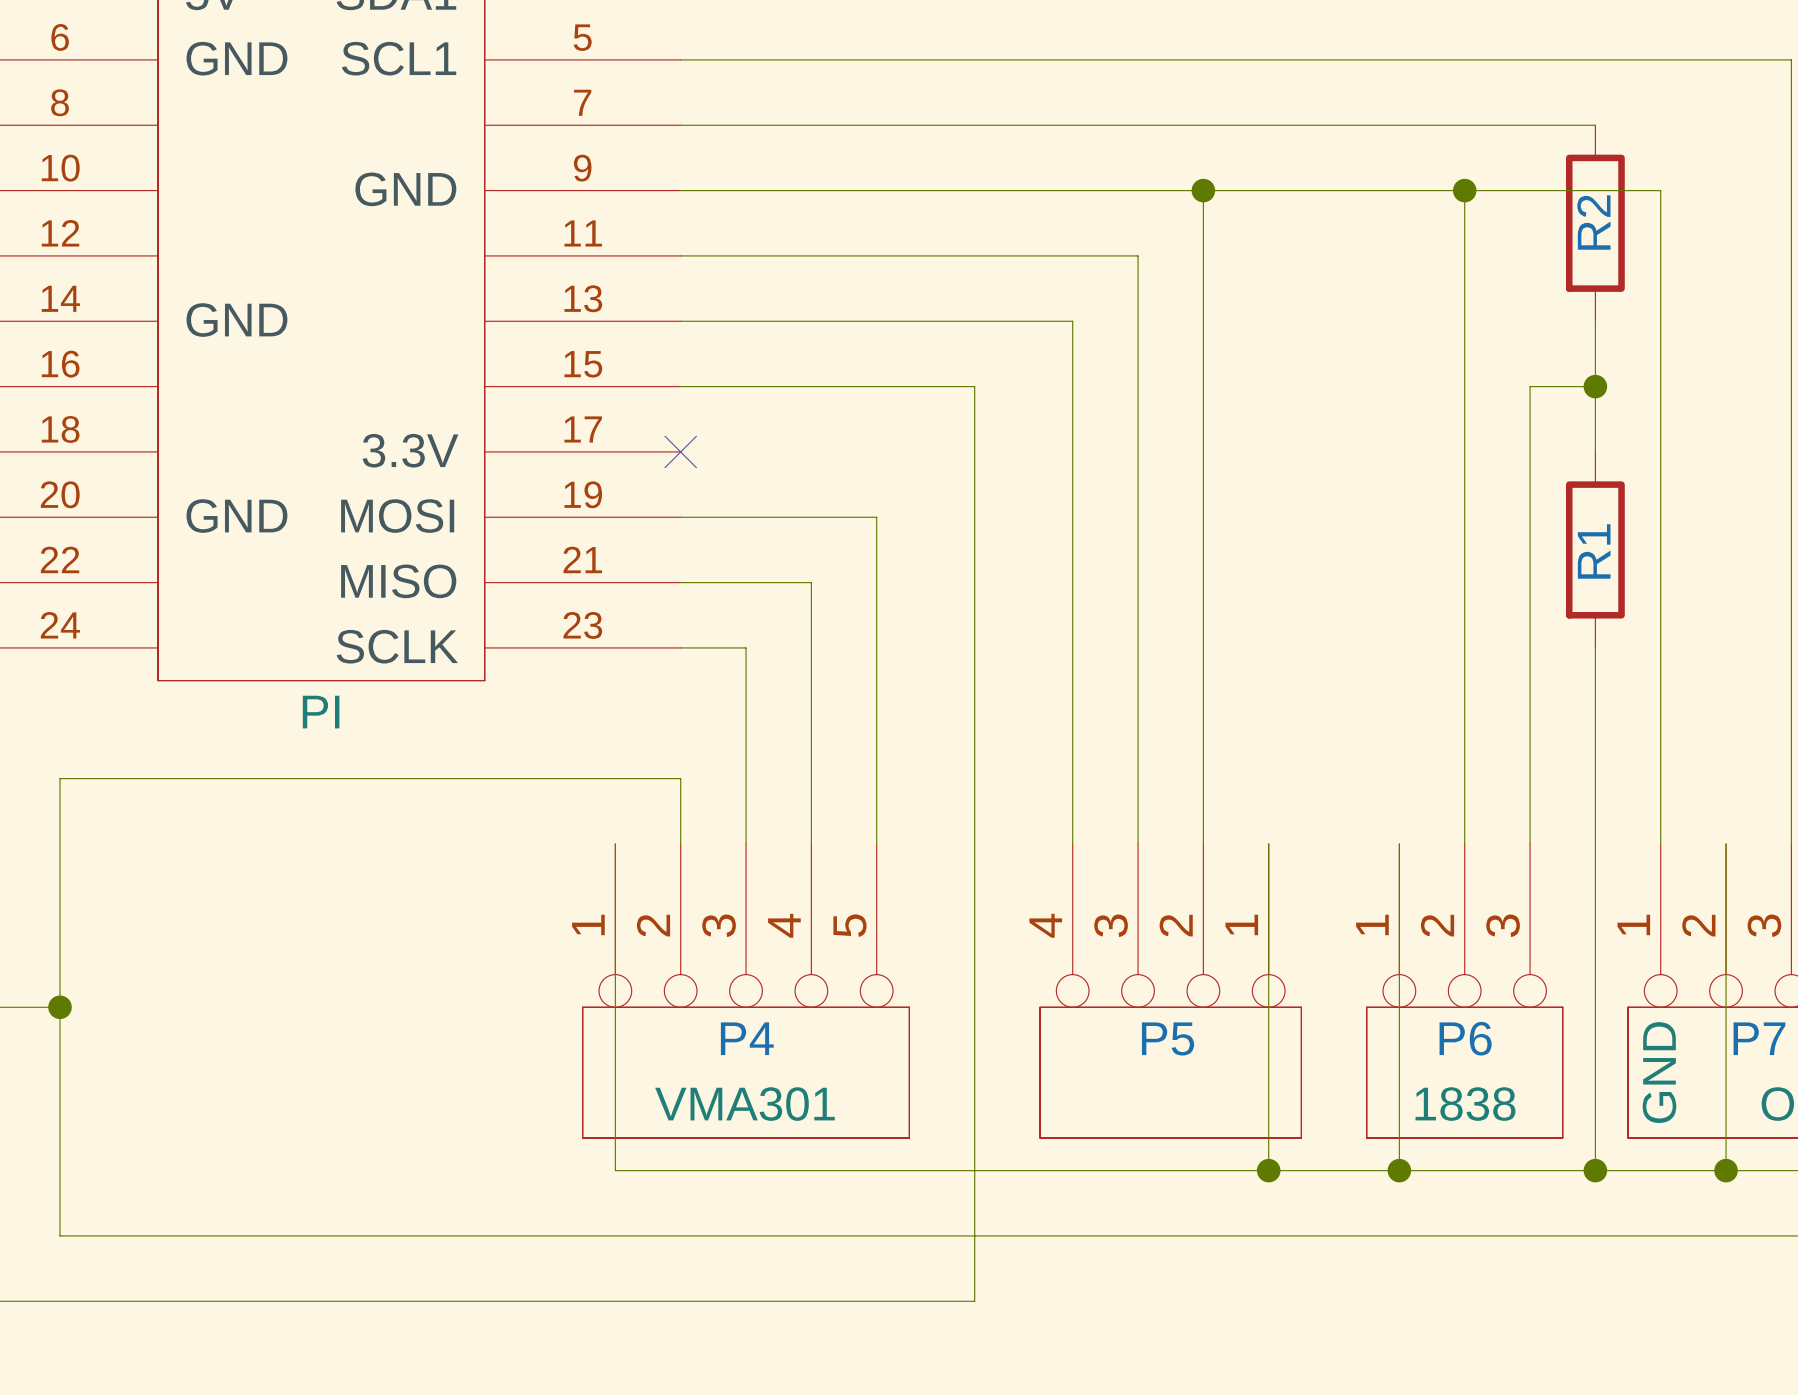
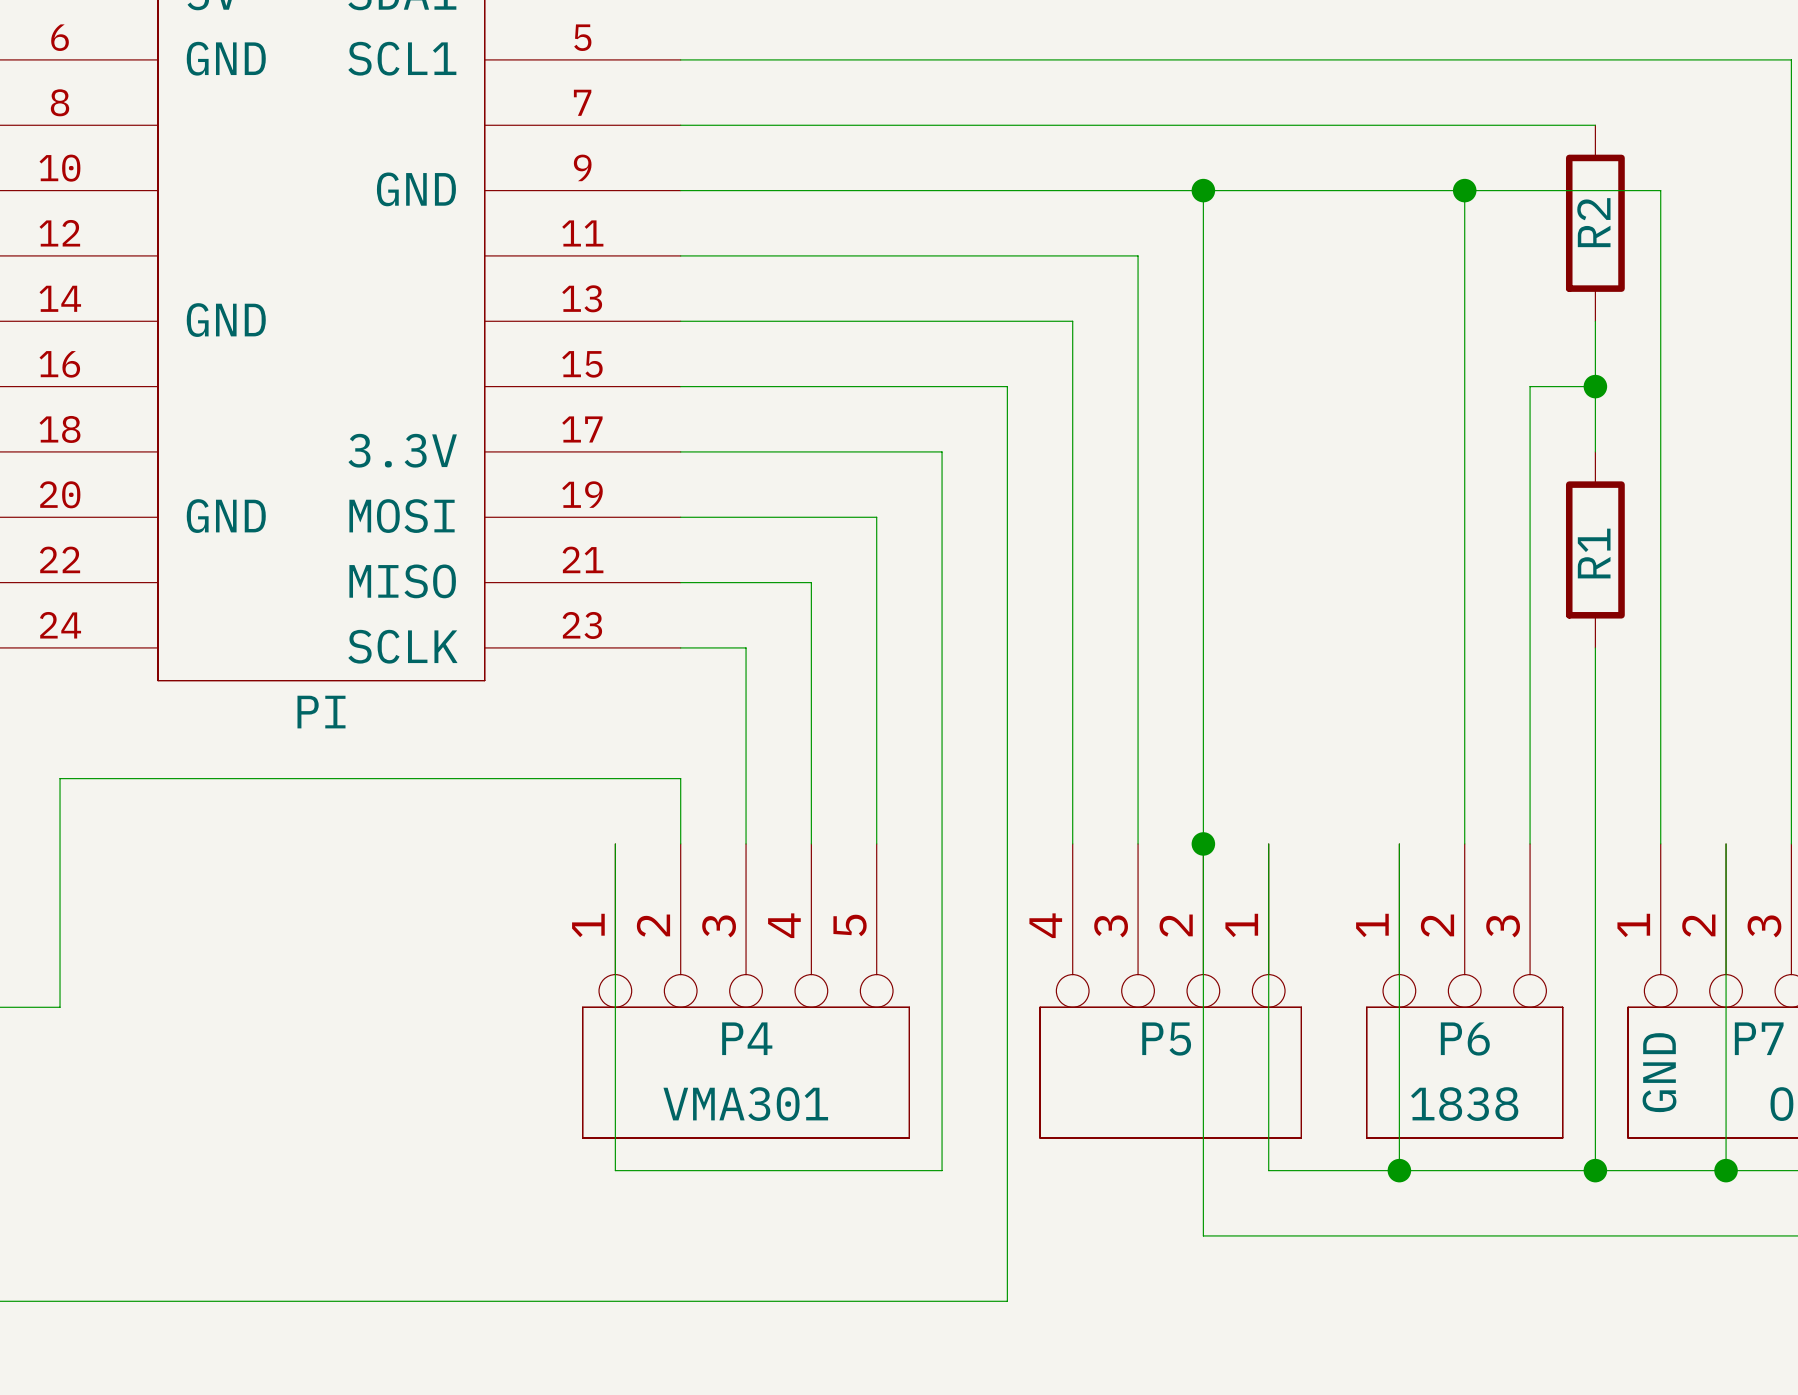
wire: (974, 386) (974, 1301) -> (974, 386) (1007, 386) (1007, 1301) (974, 1301)
no-connect mark: (680, 451) -> none
junction: none -> (1203, 843)
wire: (60, 1007) (60, 1235) (1203, 1235) -> (1203, 843) (1203, 1235)
junction: (60, 1007) -> none
wire: (942, 1170) (1268, 1170) -> (942, 1170) (942, 451) (680, 451)
junction: (1268, 1170) -> none

